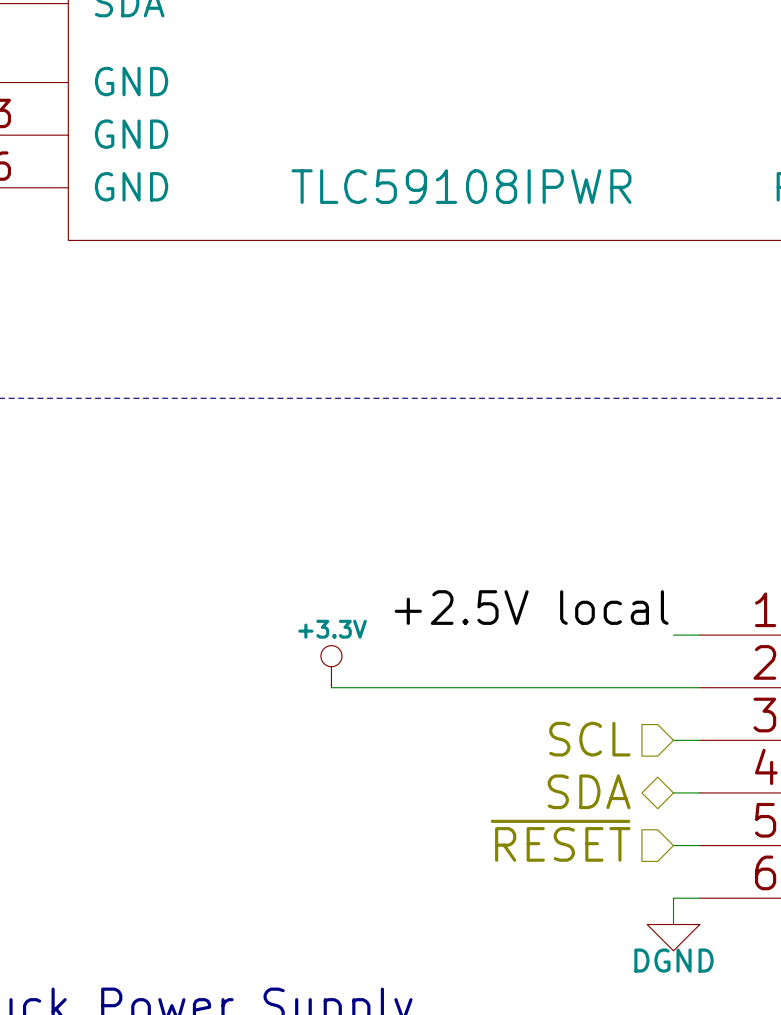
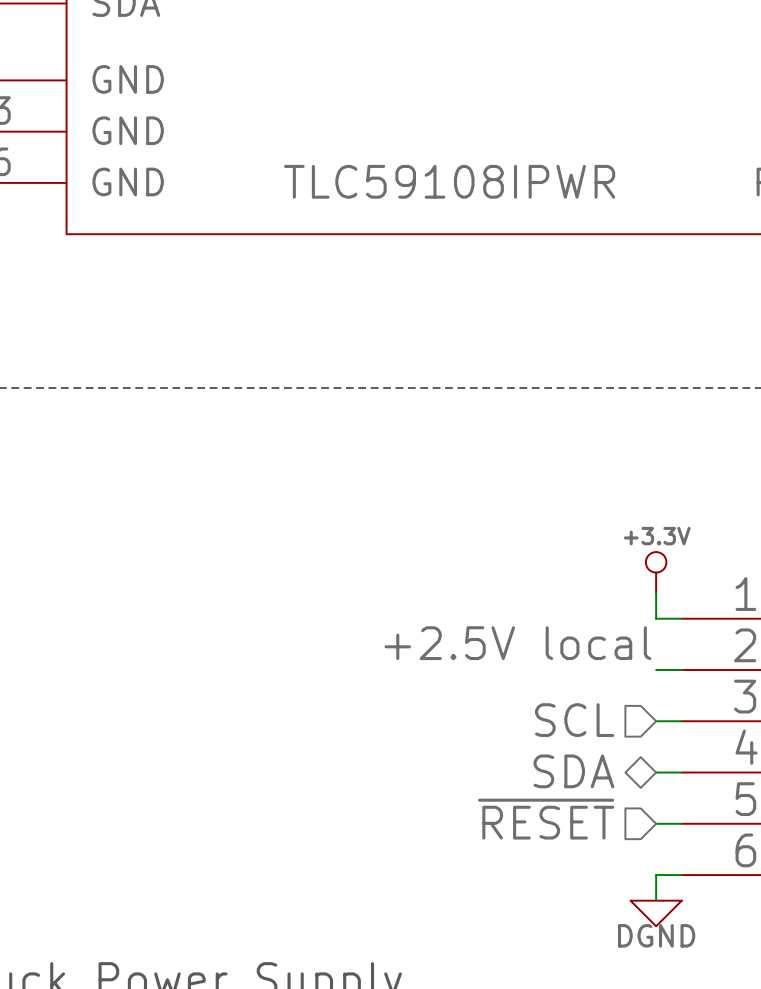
label position: +2.5V local (531, 607) -> +2.5V local (517, 643)
wire: none -> (656, 593) (656, 618)
power symbol position: +3.3V (331, 666) -> +3.3V (656, 572)
wire: (331, 687) (673, 687) -> none

